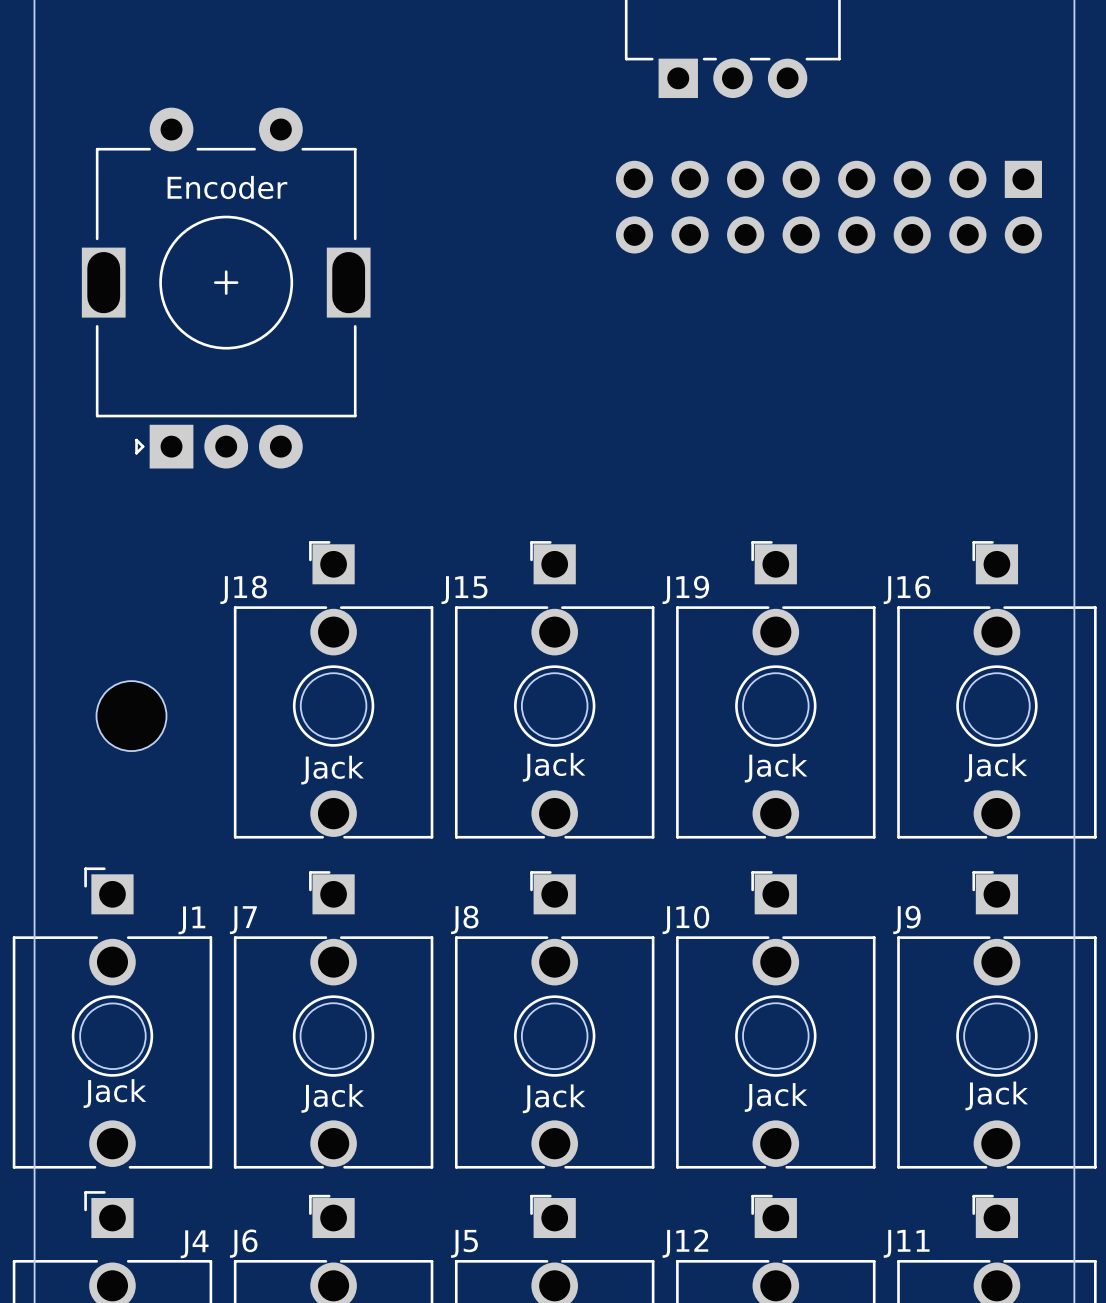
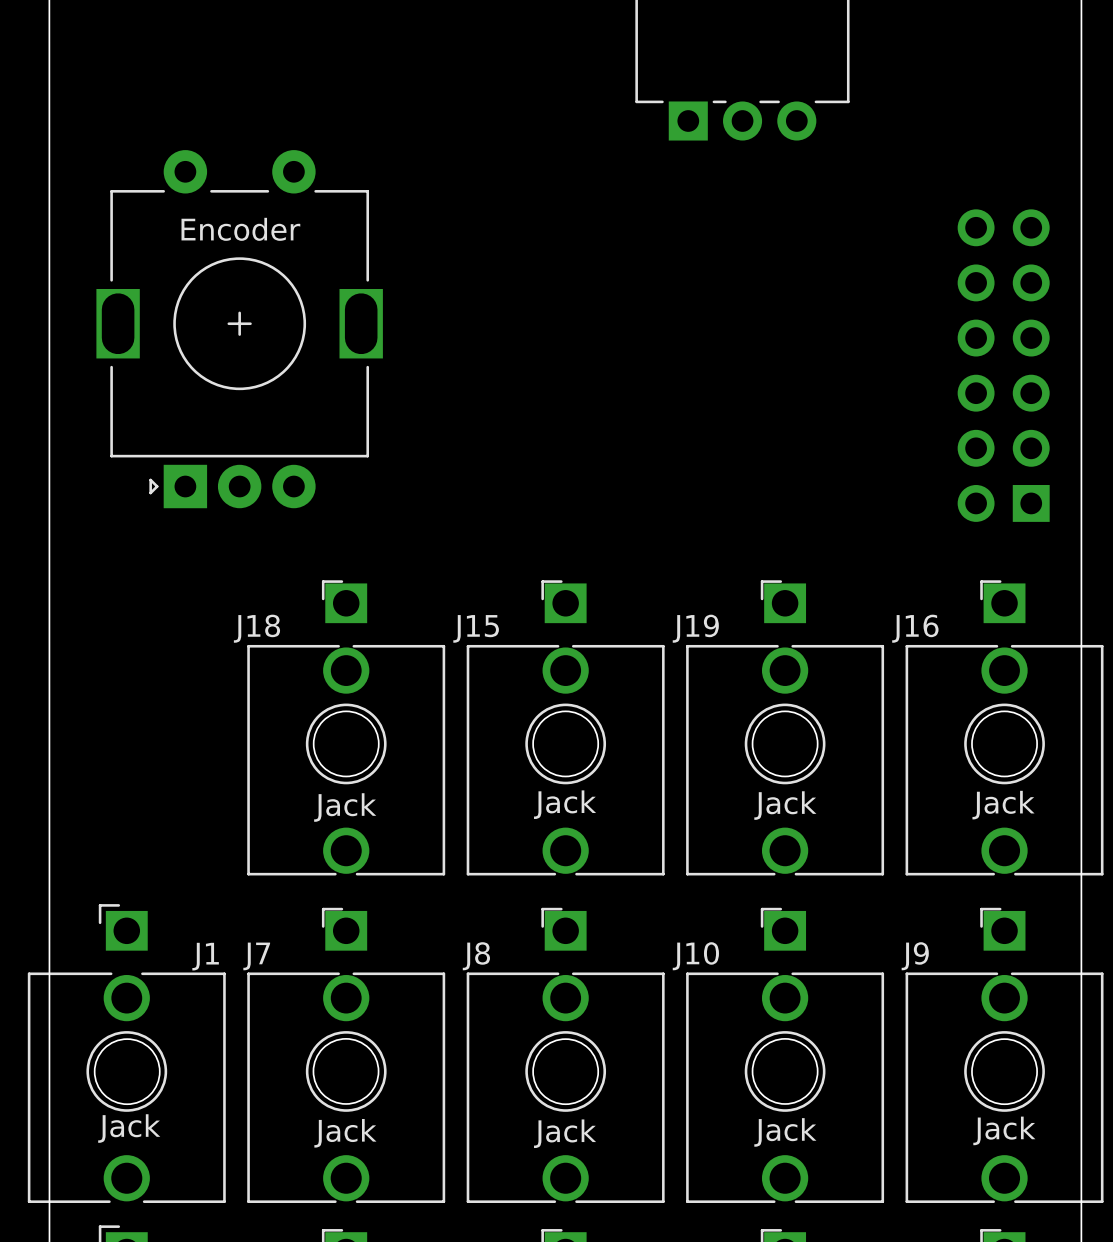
part: (828, 207) -> none
part: none -> (1003, 365)
part: (131, 716) -> none

